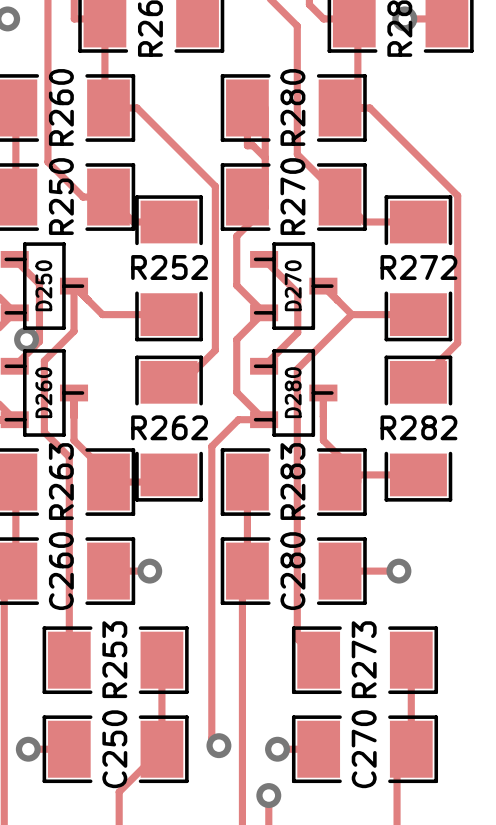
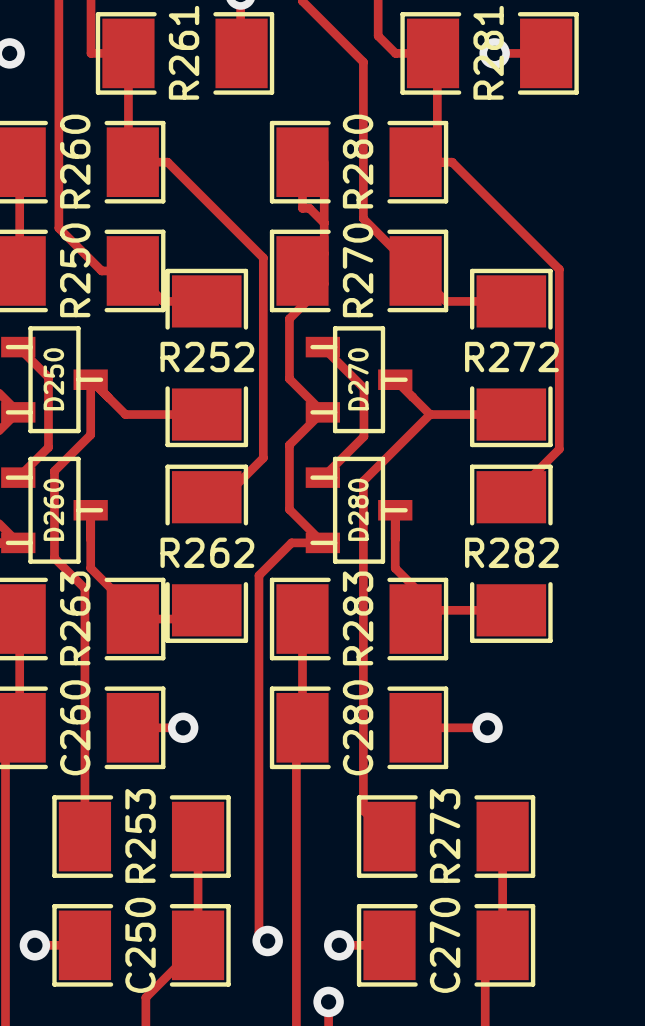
via: (26, 339) -> none

